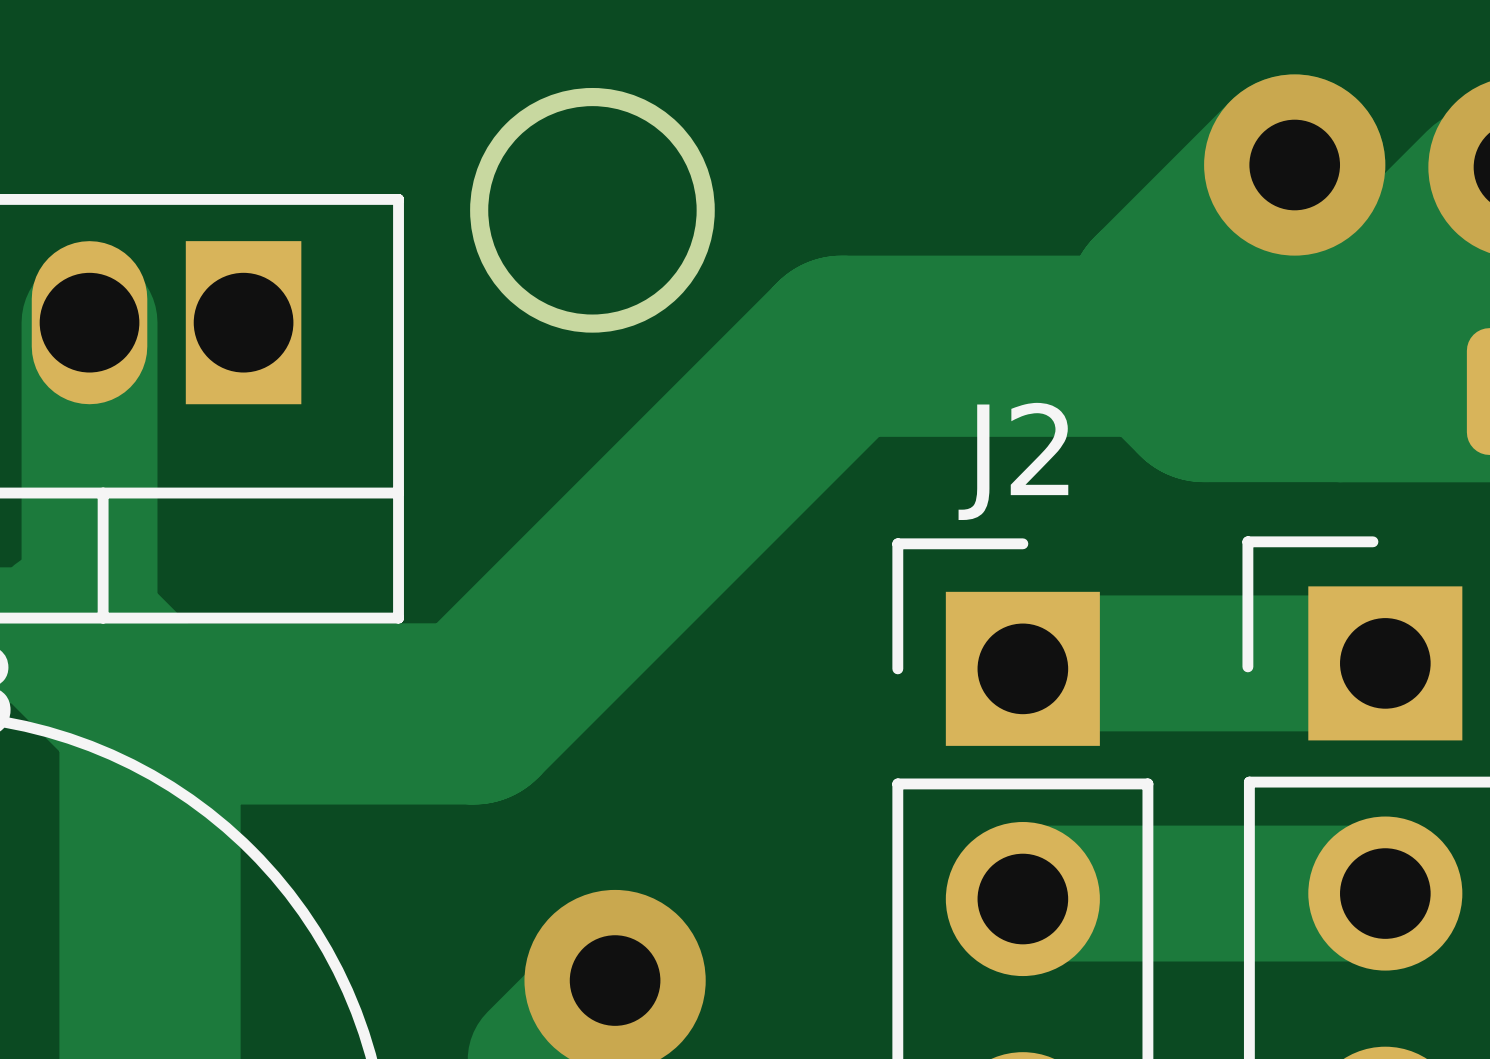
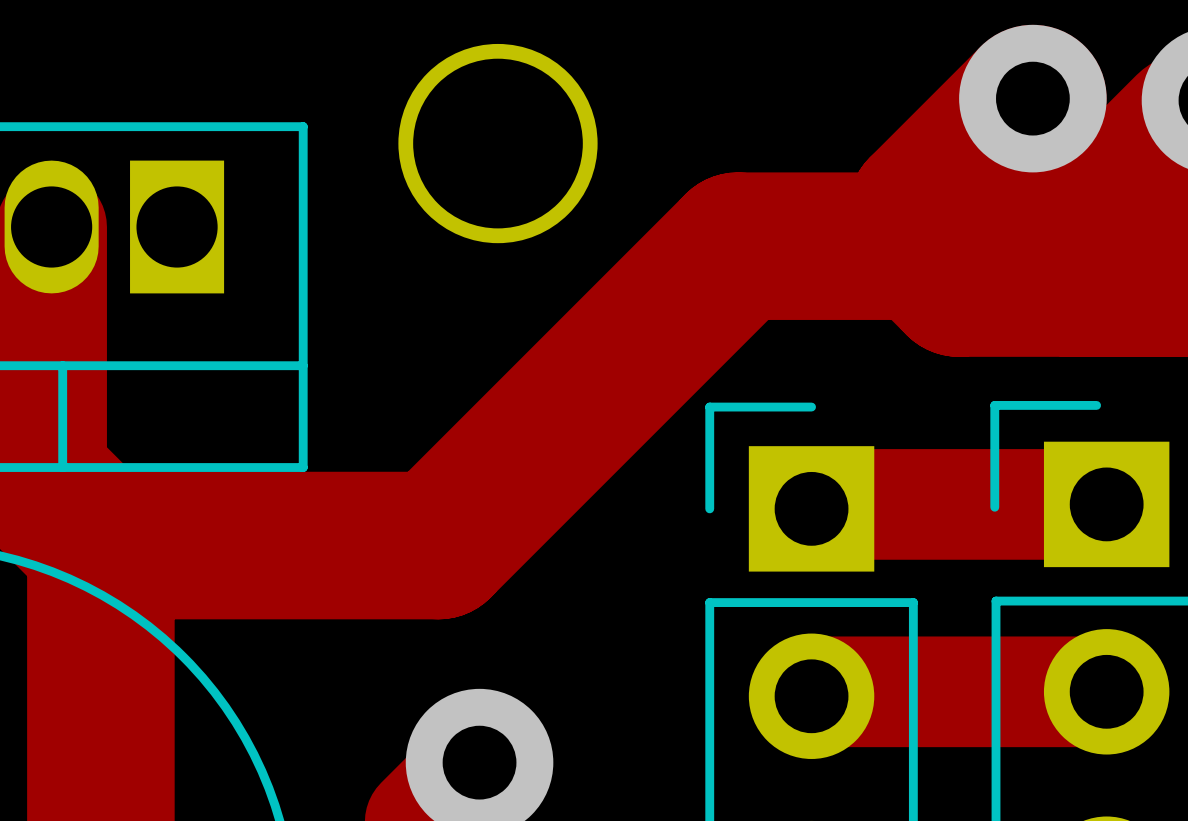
round board edge position: (592, 210) -> (497, 143)
track: (932, 346) (841, 346) (473, 713) -> (737, 246) (438, 545) (364, 545)
J2 name: J2 (1013, 461) -> none

